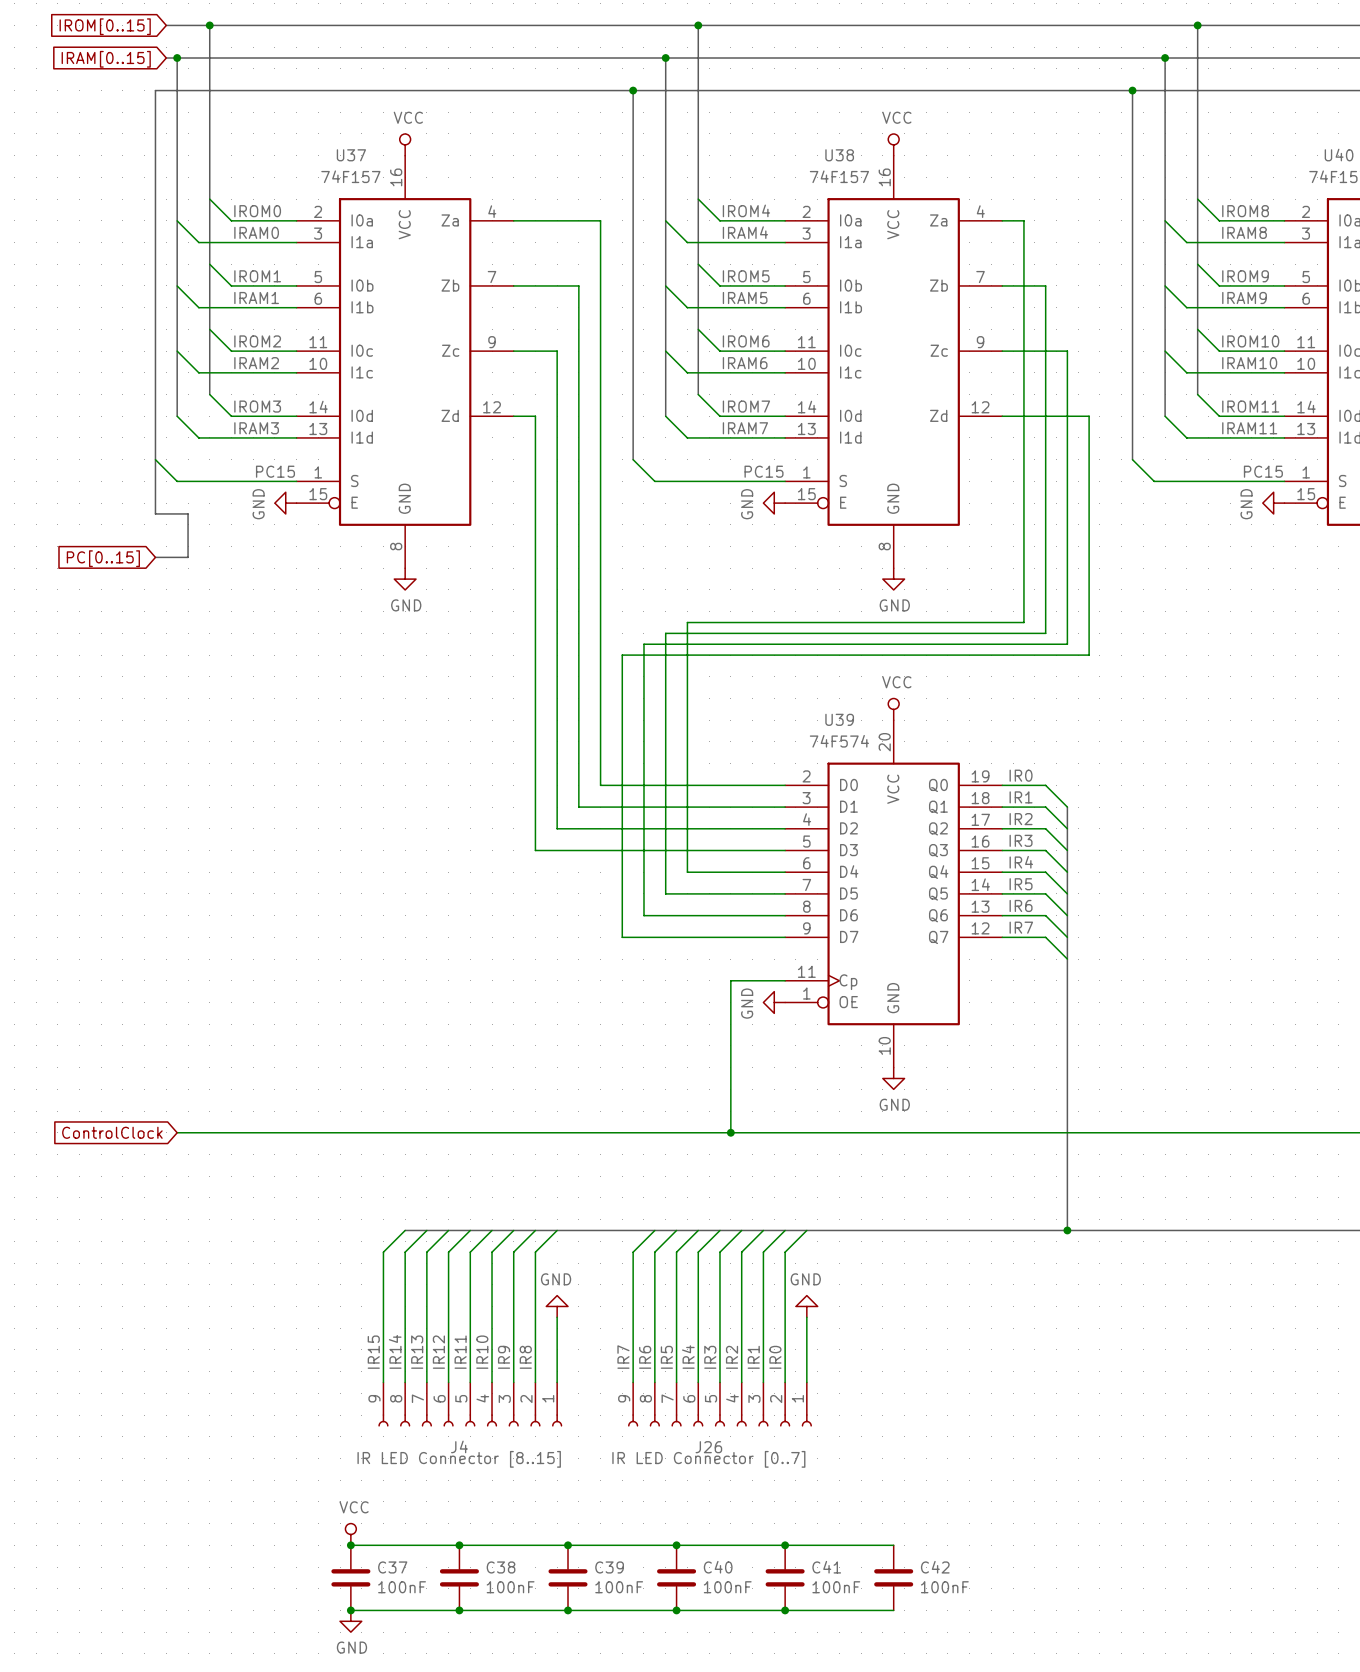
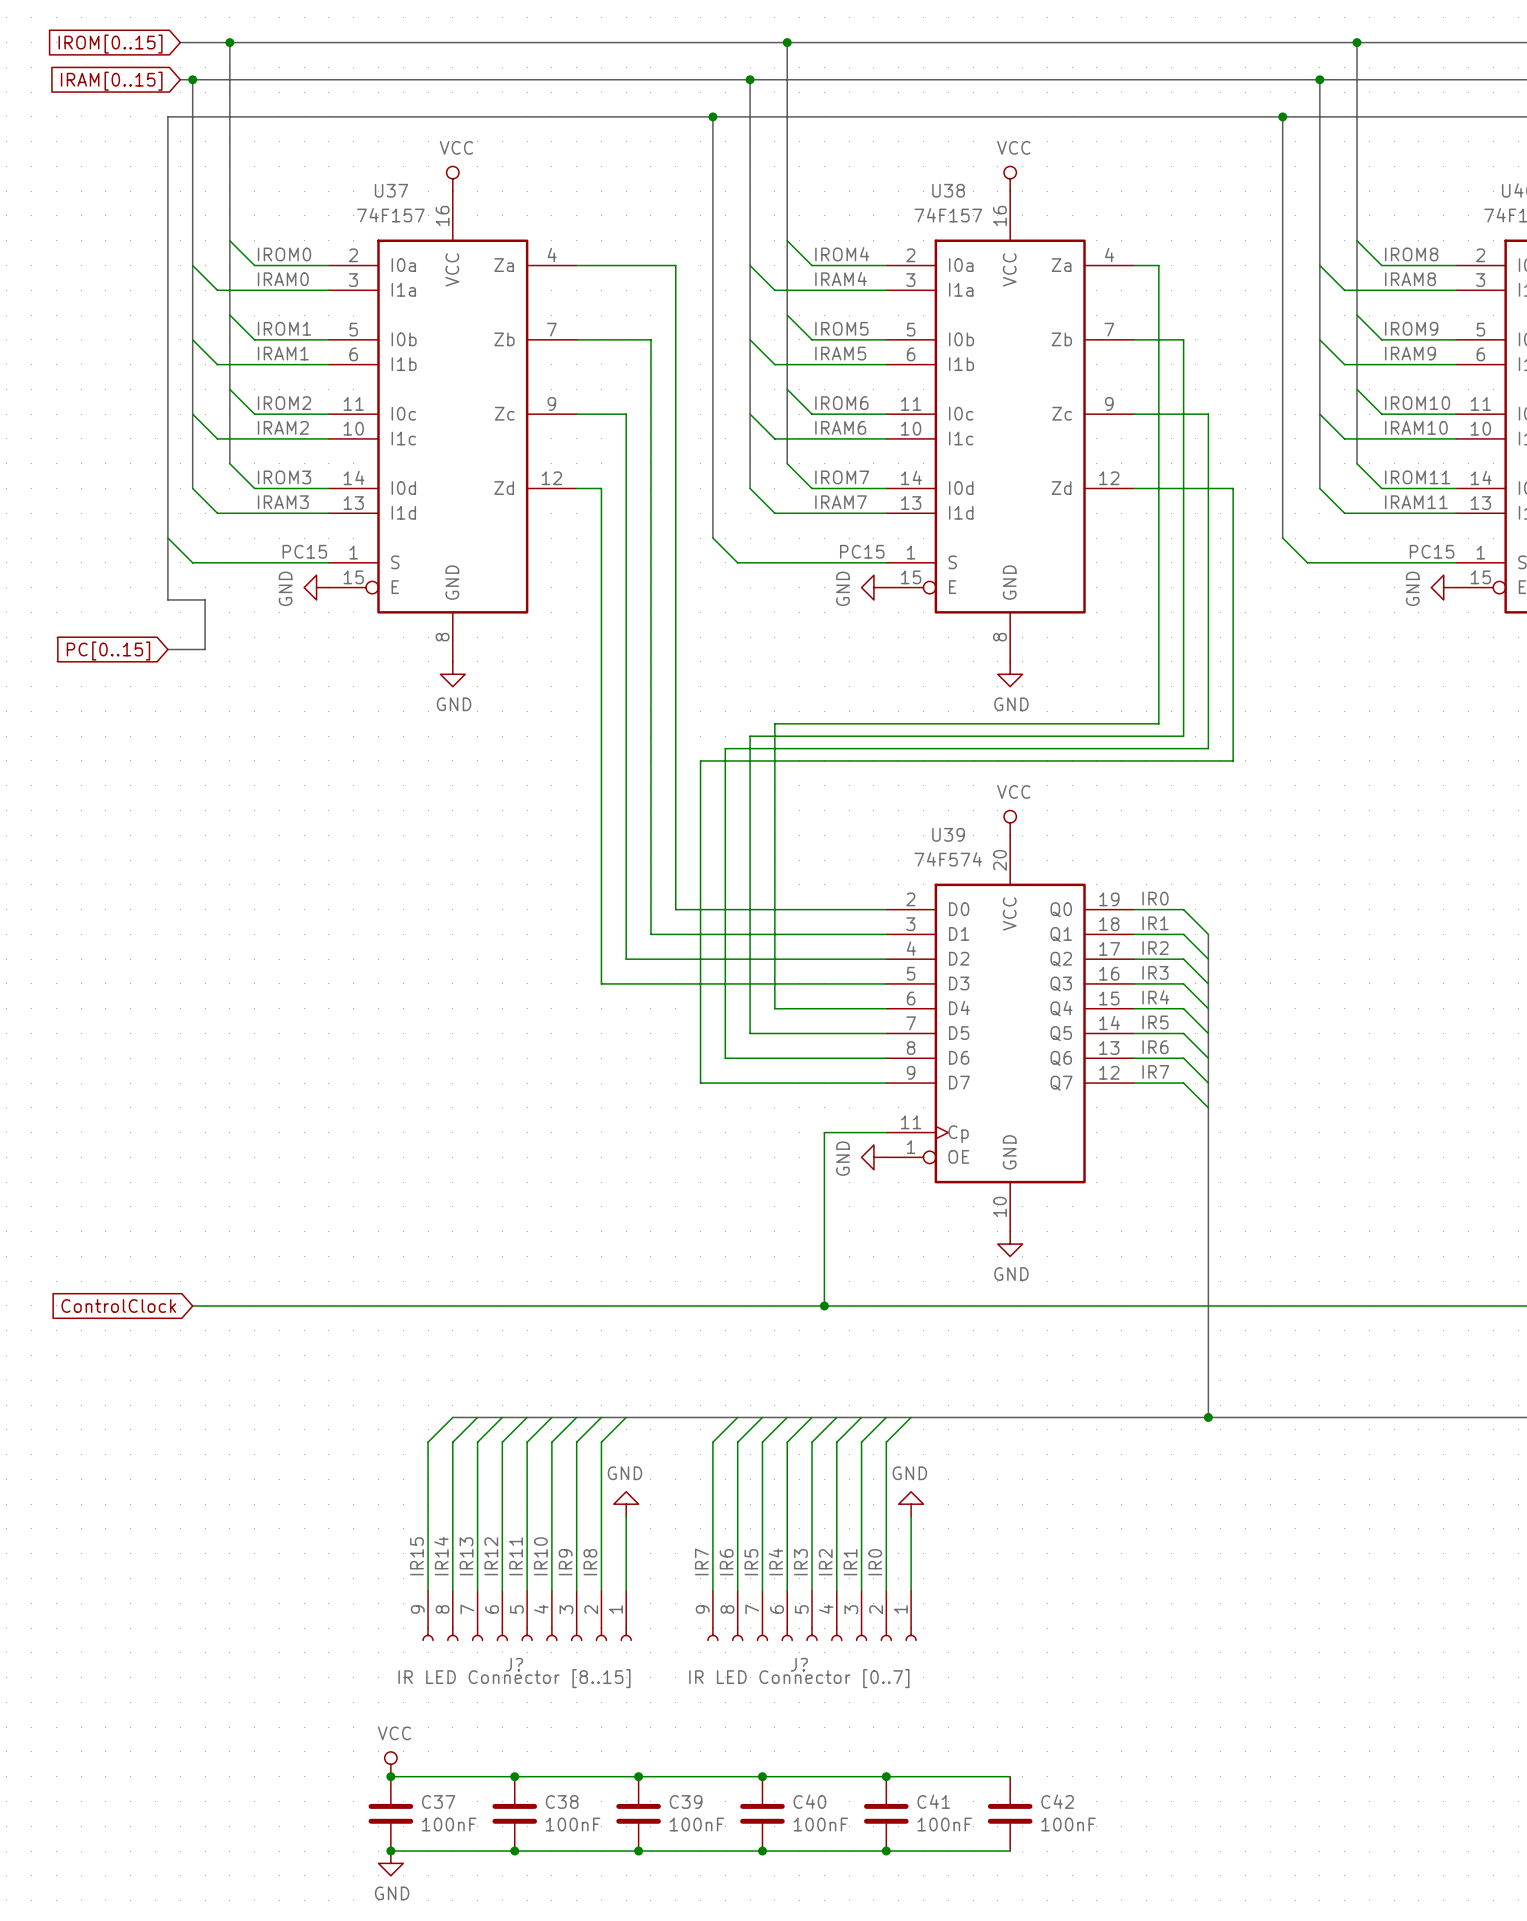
J4 name: J4 (459, 1446) -> J? (514, 1664)
J26 name: J26 (708, 1447) -> J? (799, 1664)

